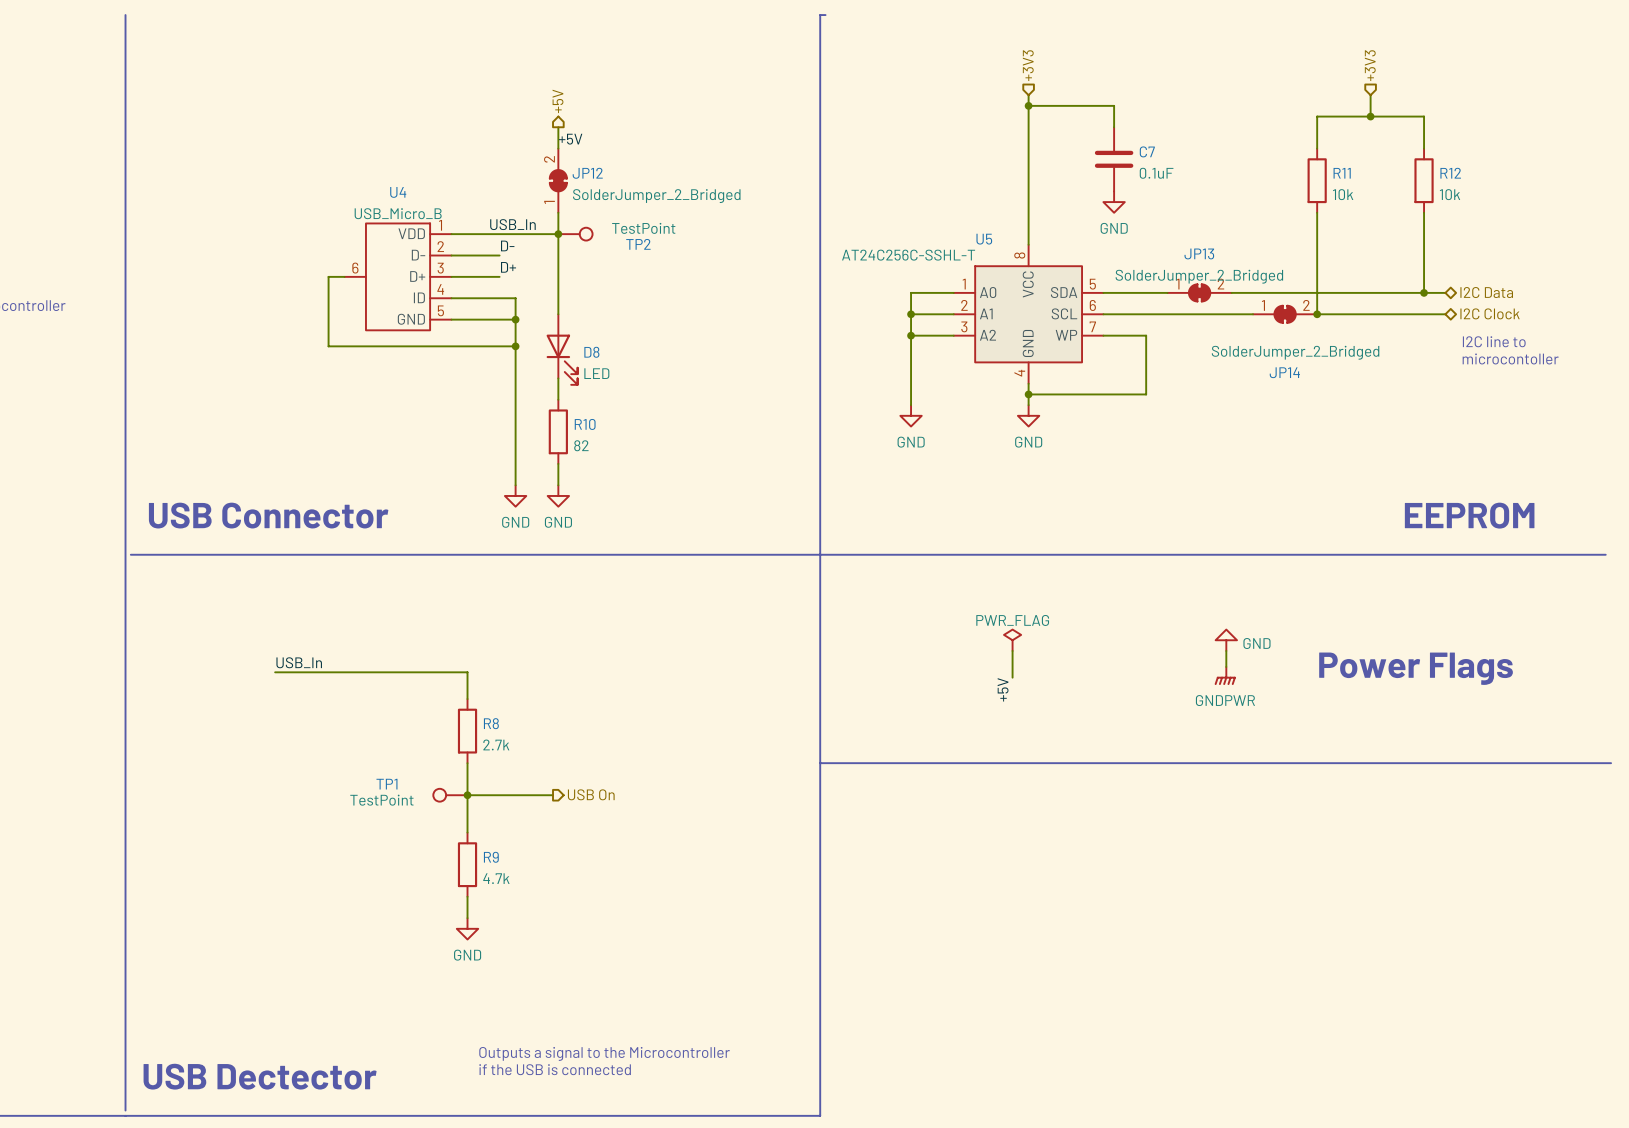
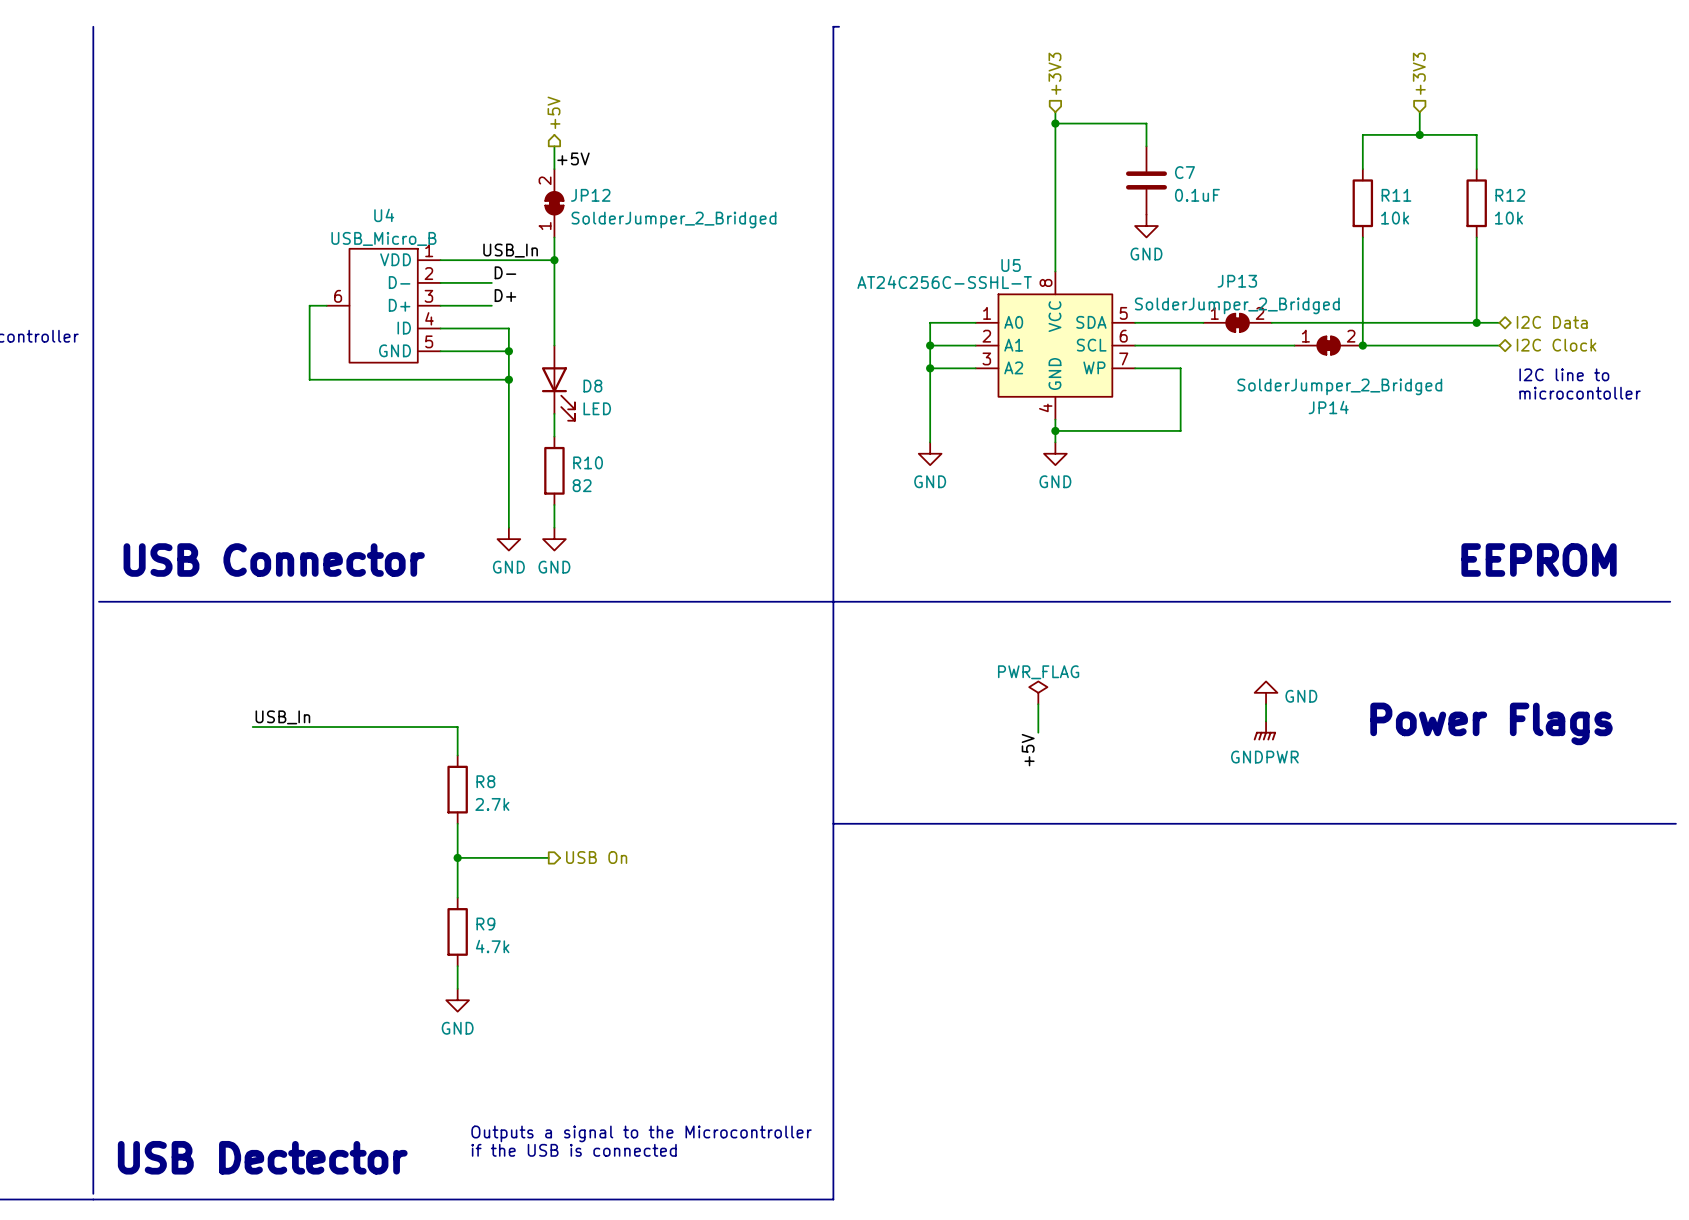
TP2: TestPoint (575, 234) -> none
TP1: TestPoint (450, 795) -> none

